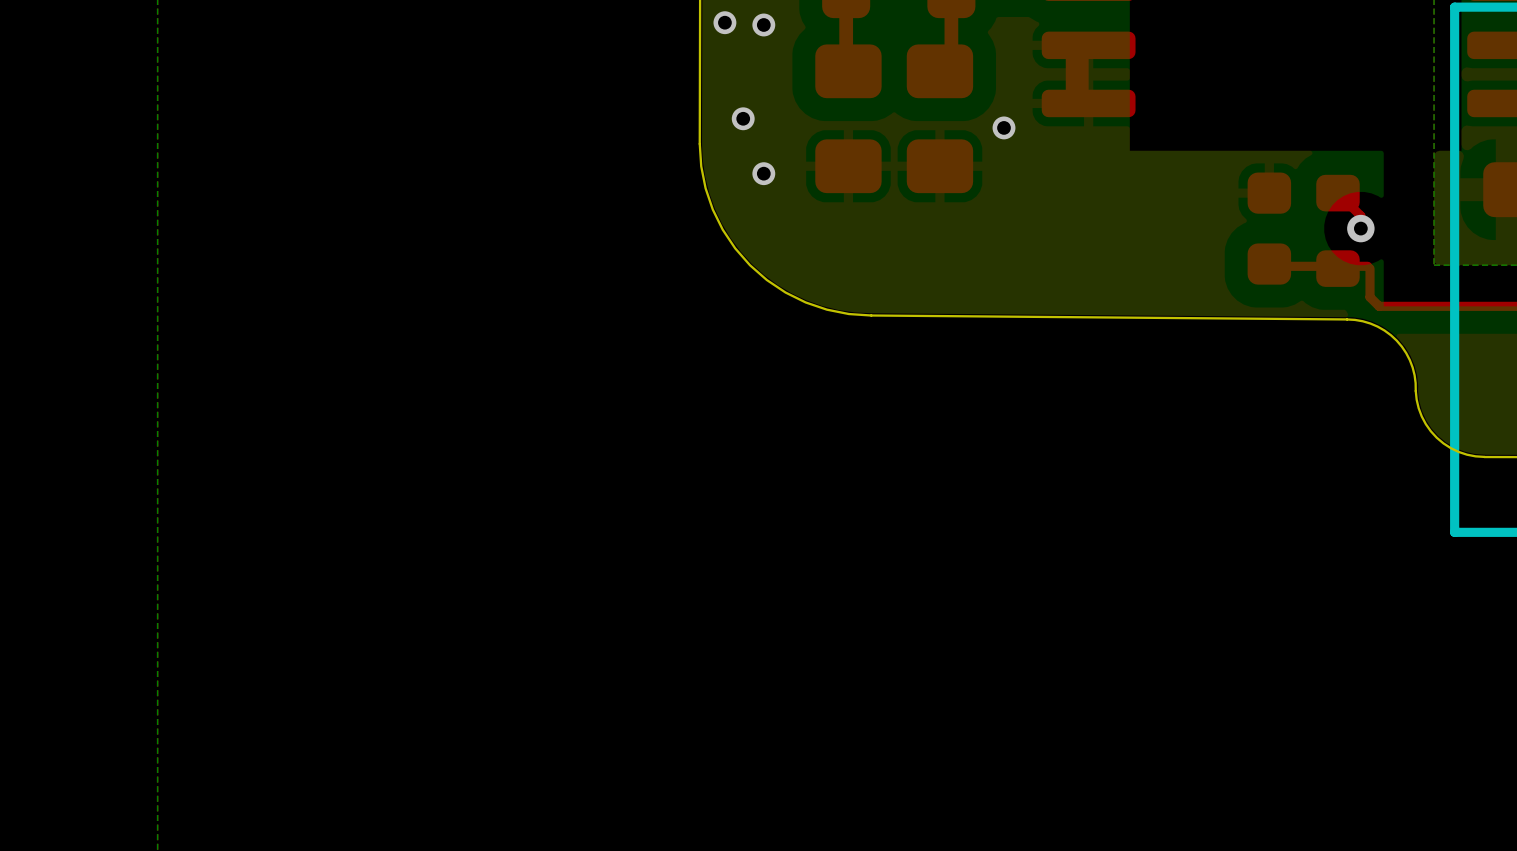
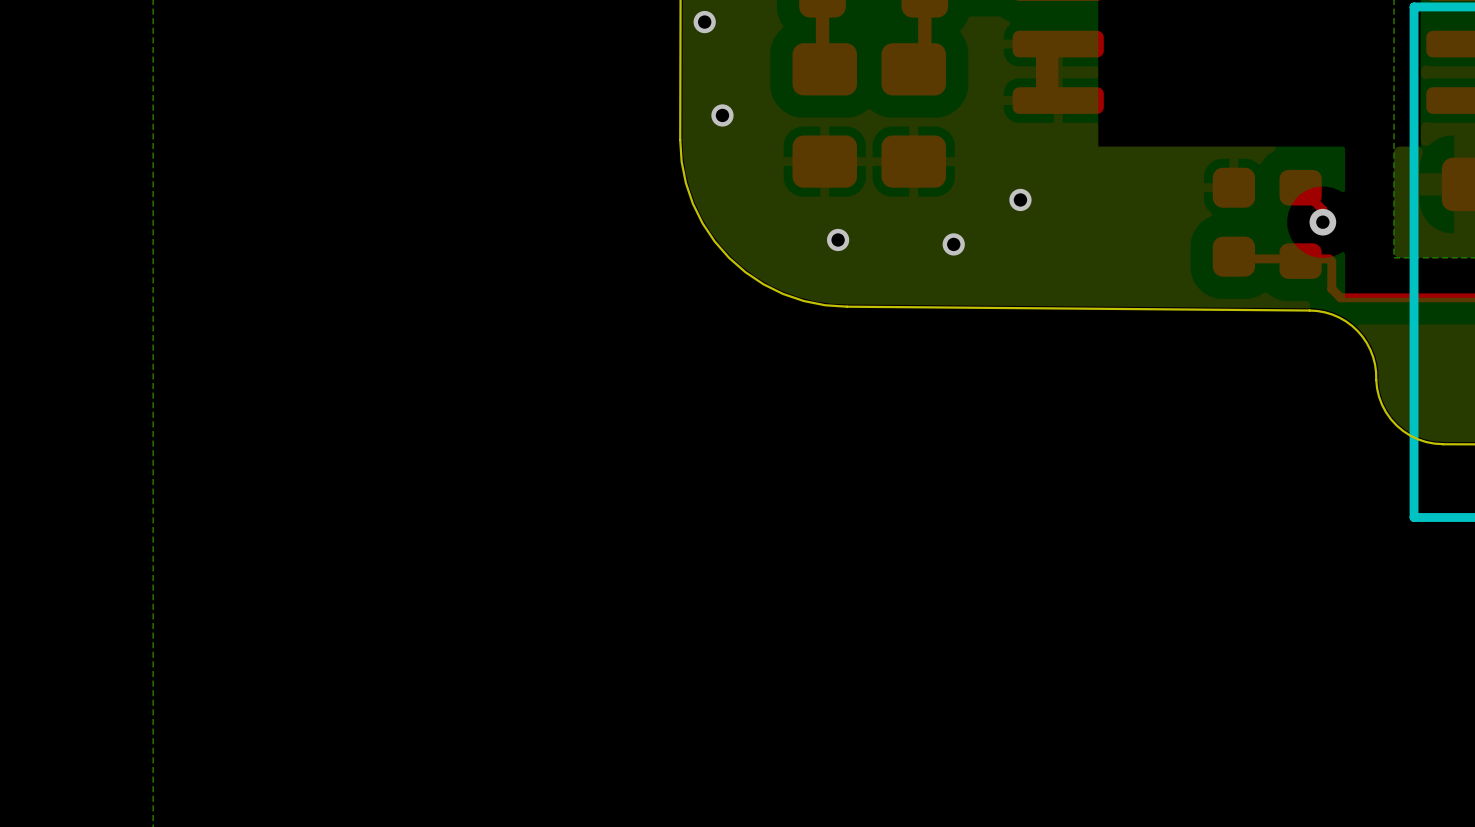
via: (763, 24) -> none
via: (1004, 127) -> none
via: (763, 173) -> none
via: none -> (1020, 199)
via: none -> (838, 239)
via: none -> (953, 244)

